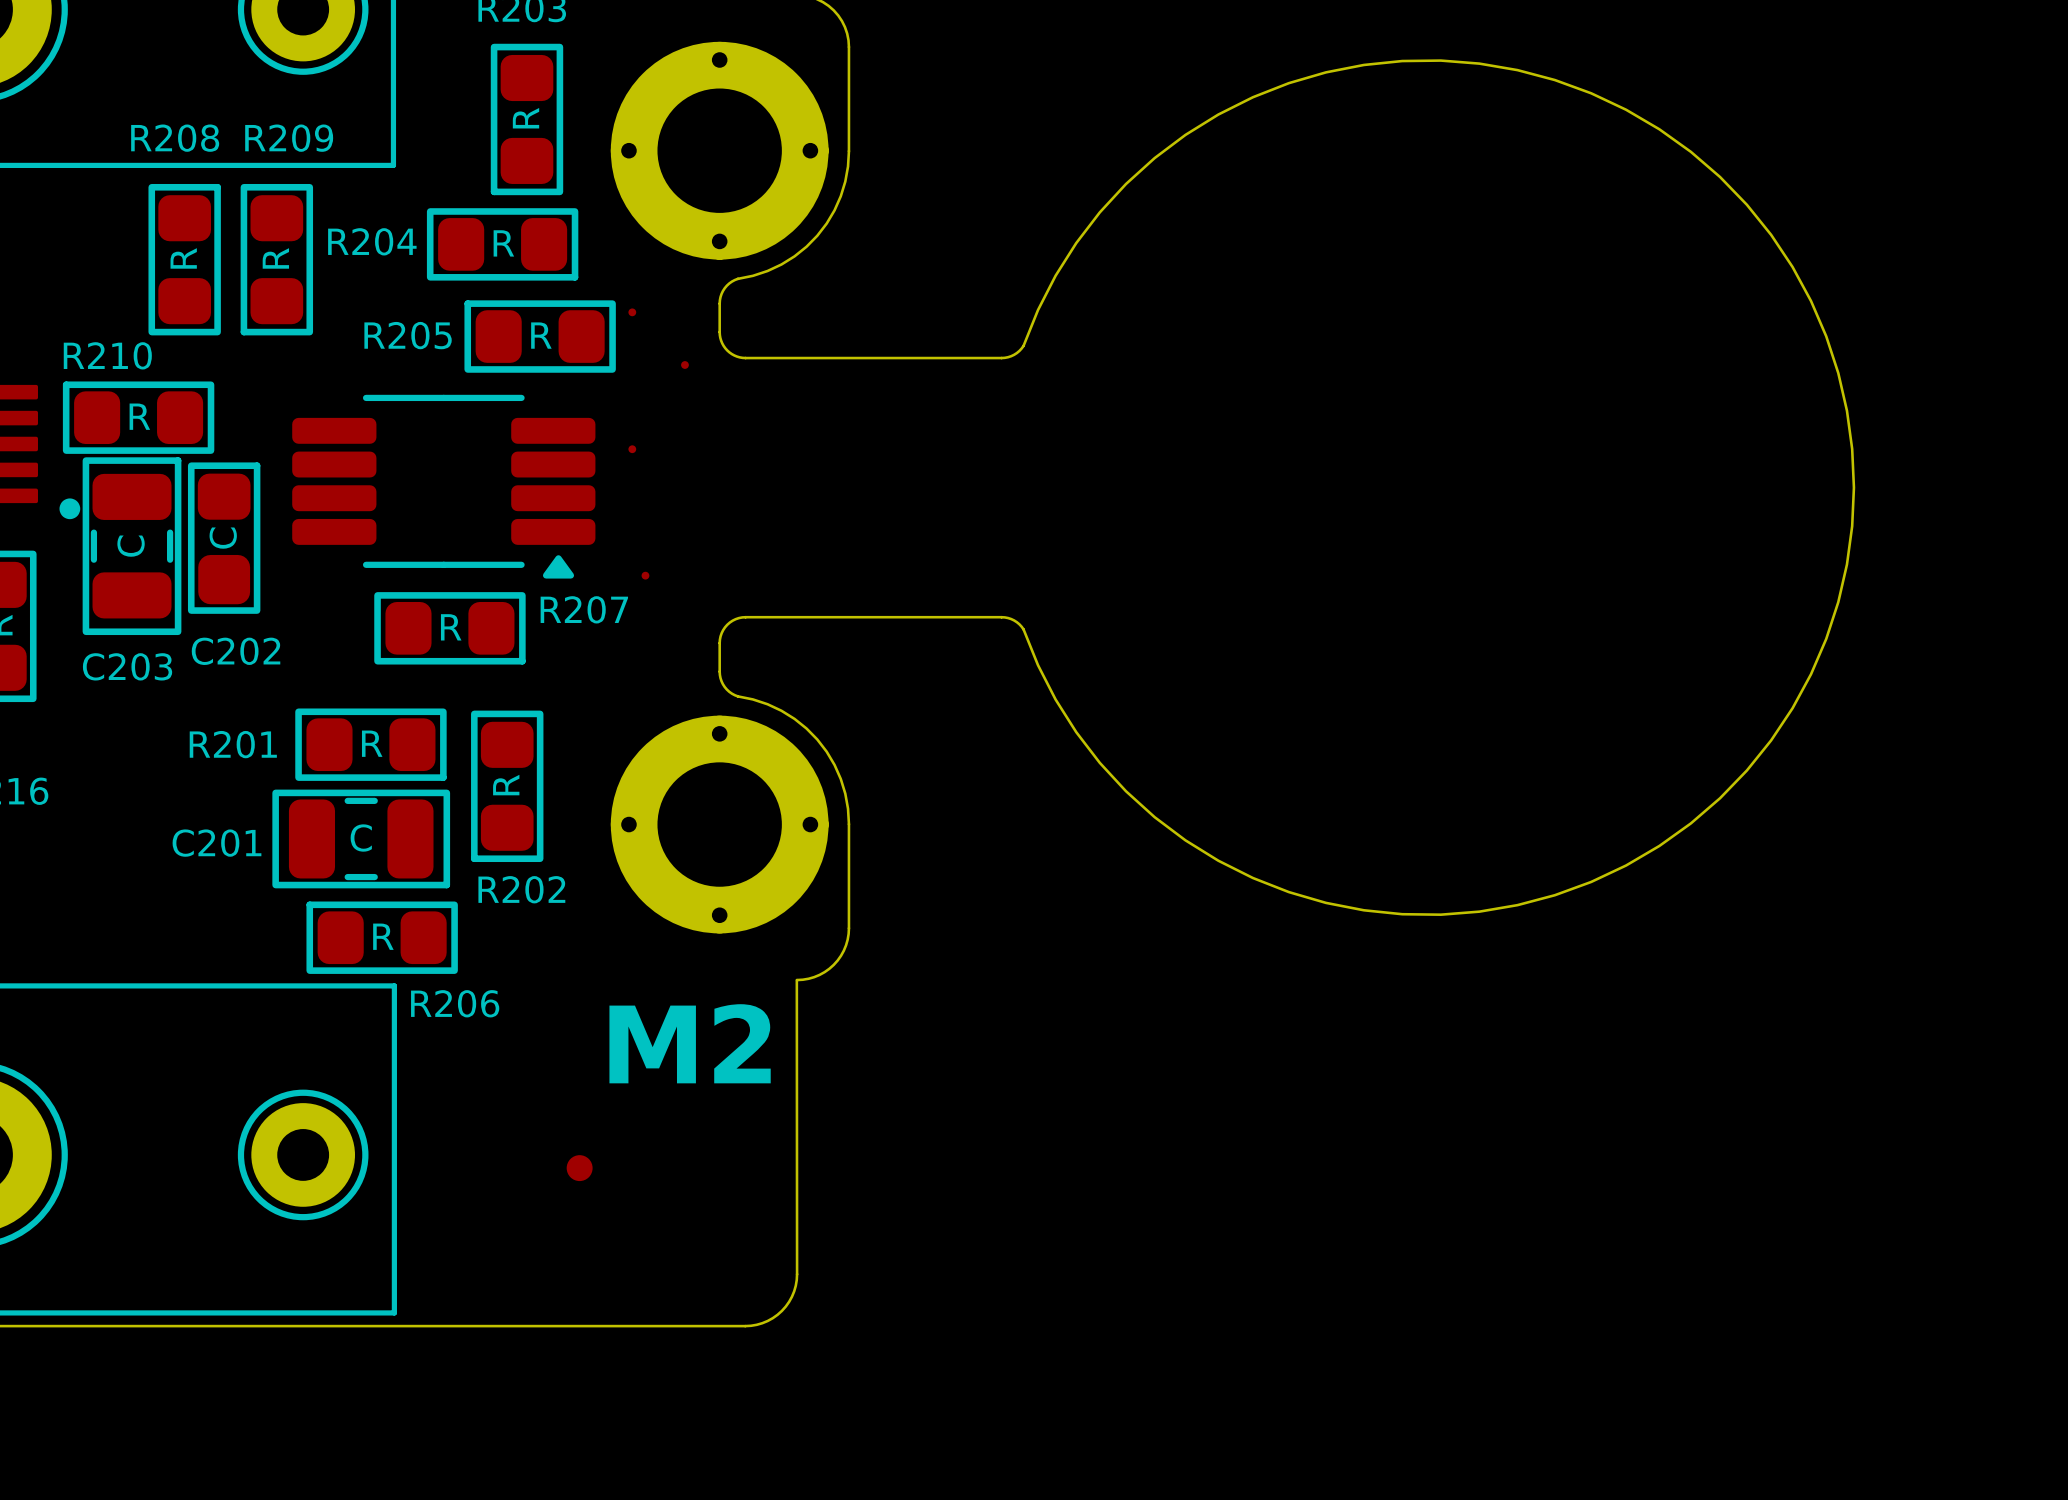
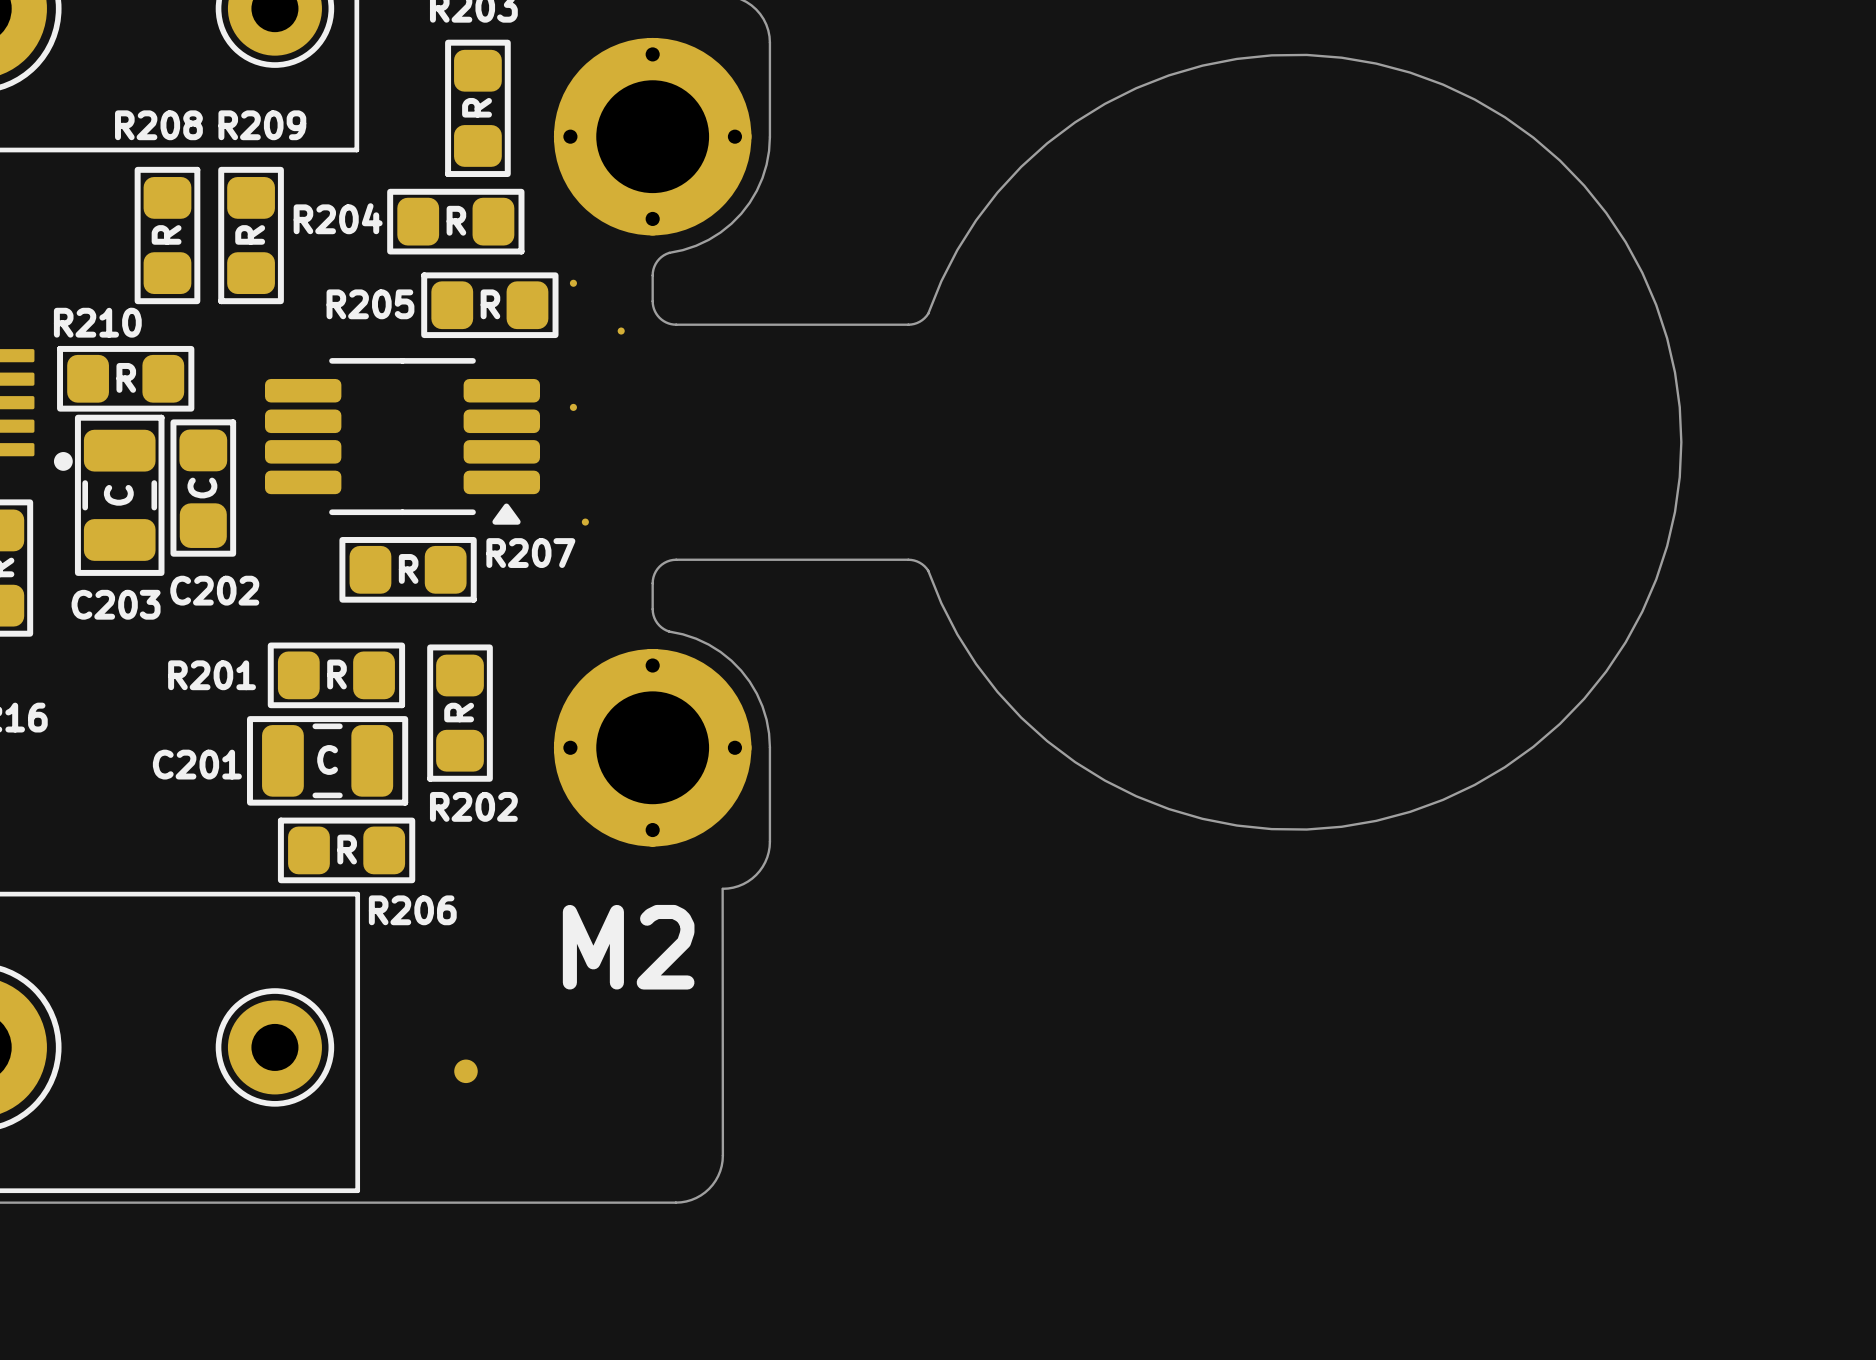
part position: (579, 1168) -> (465, 1071)

